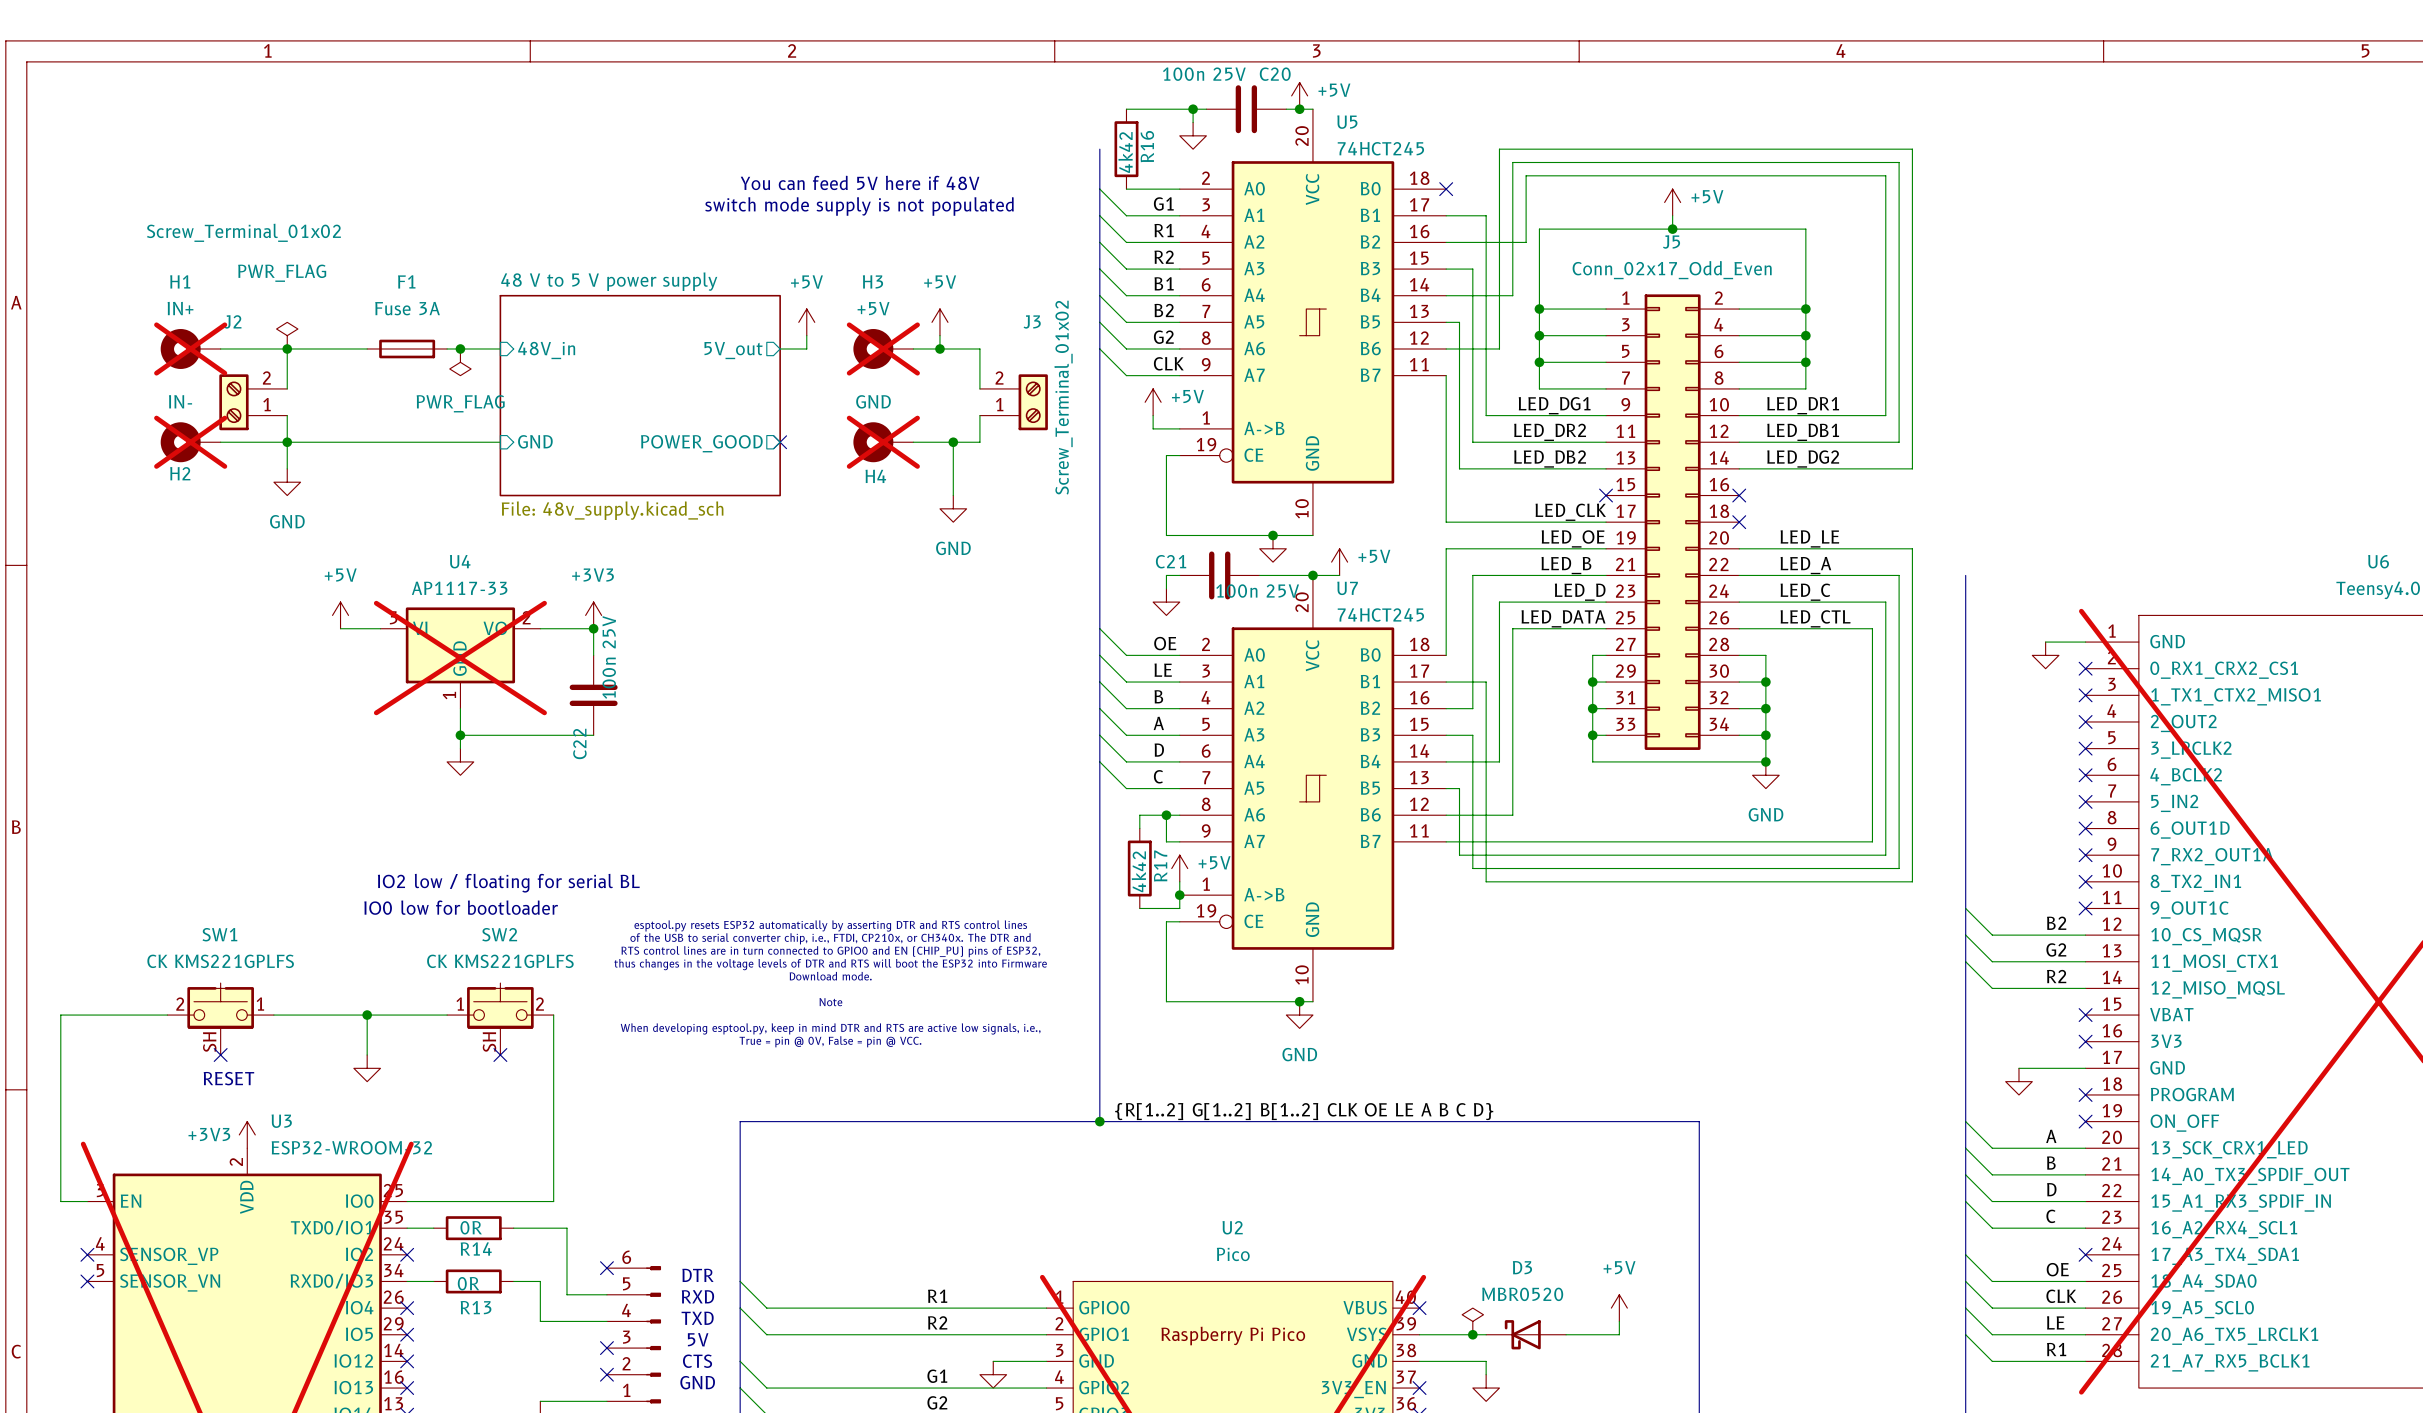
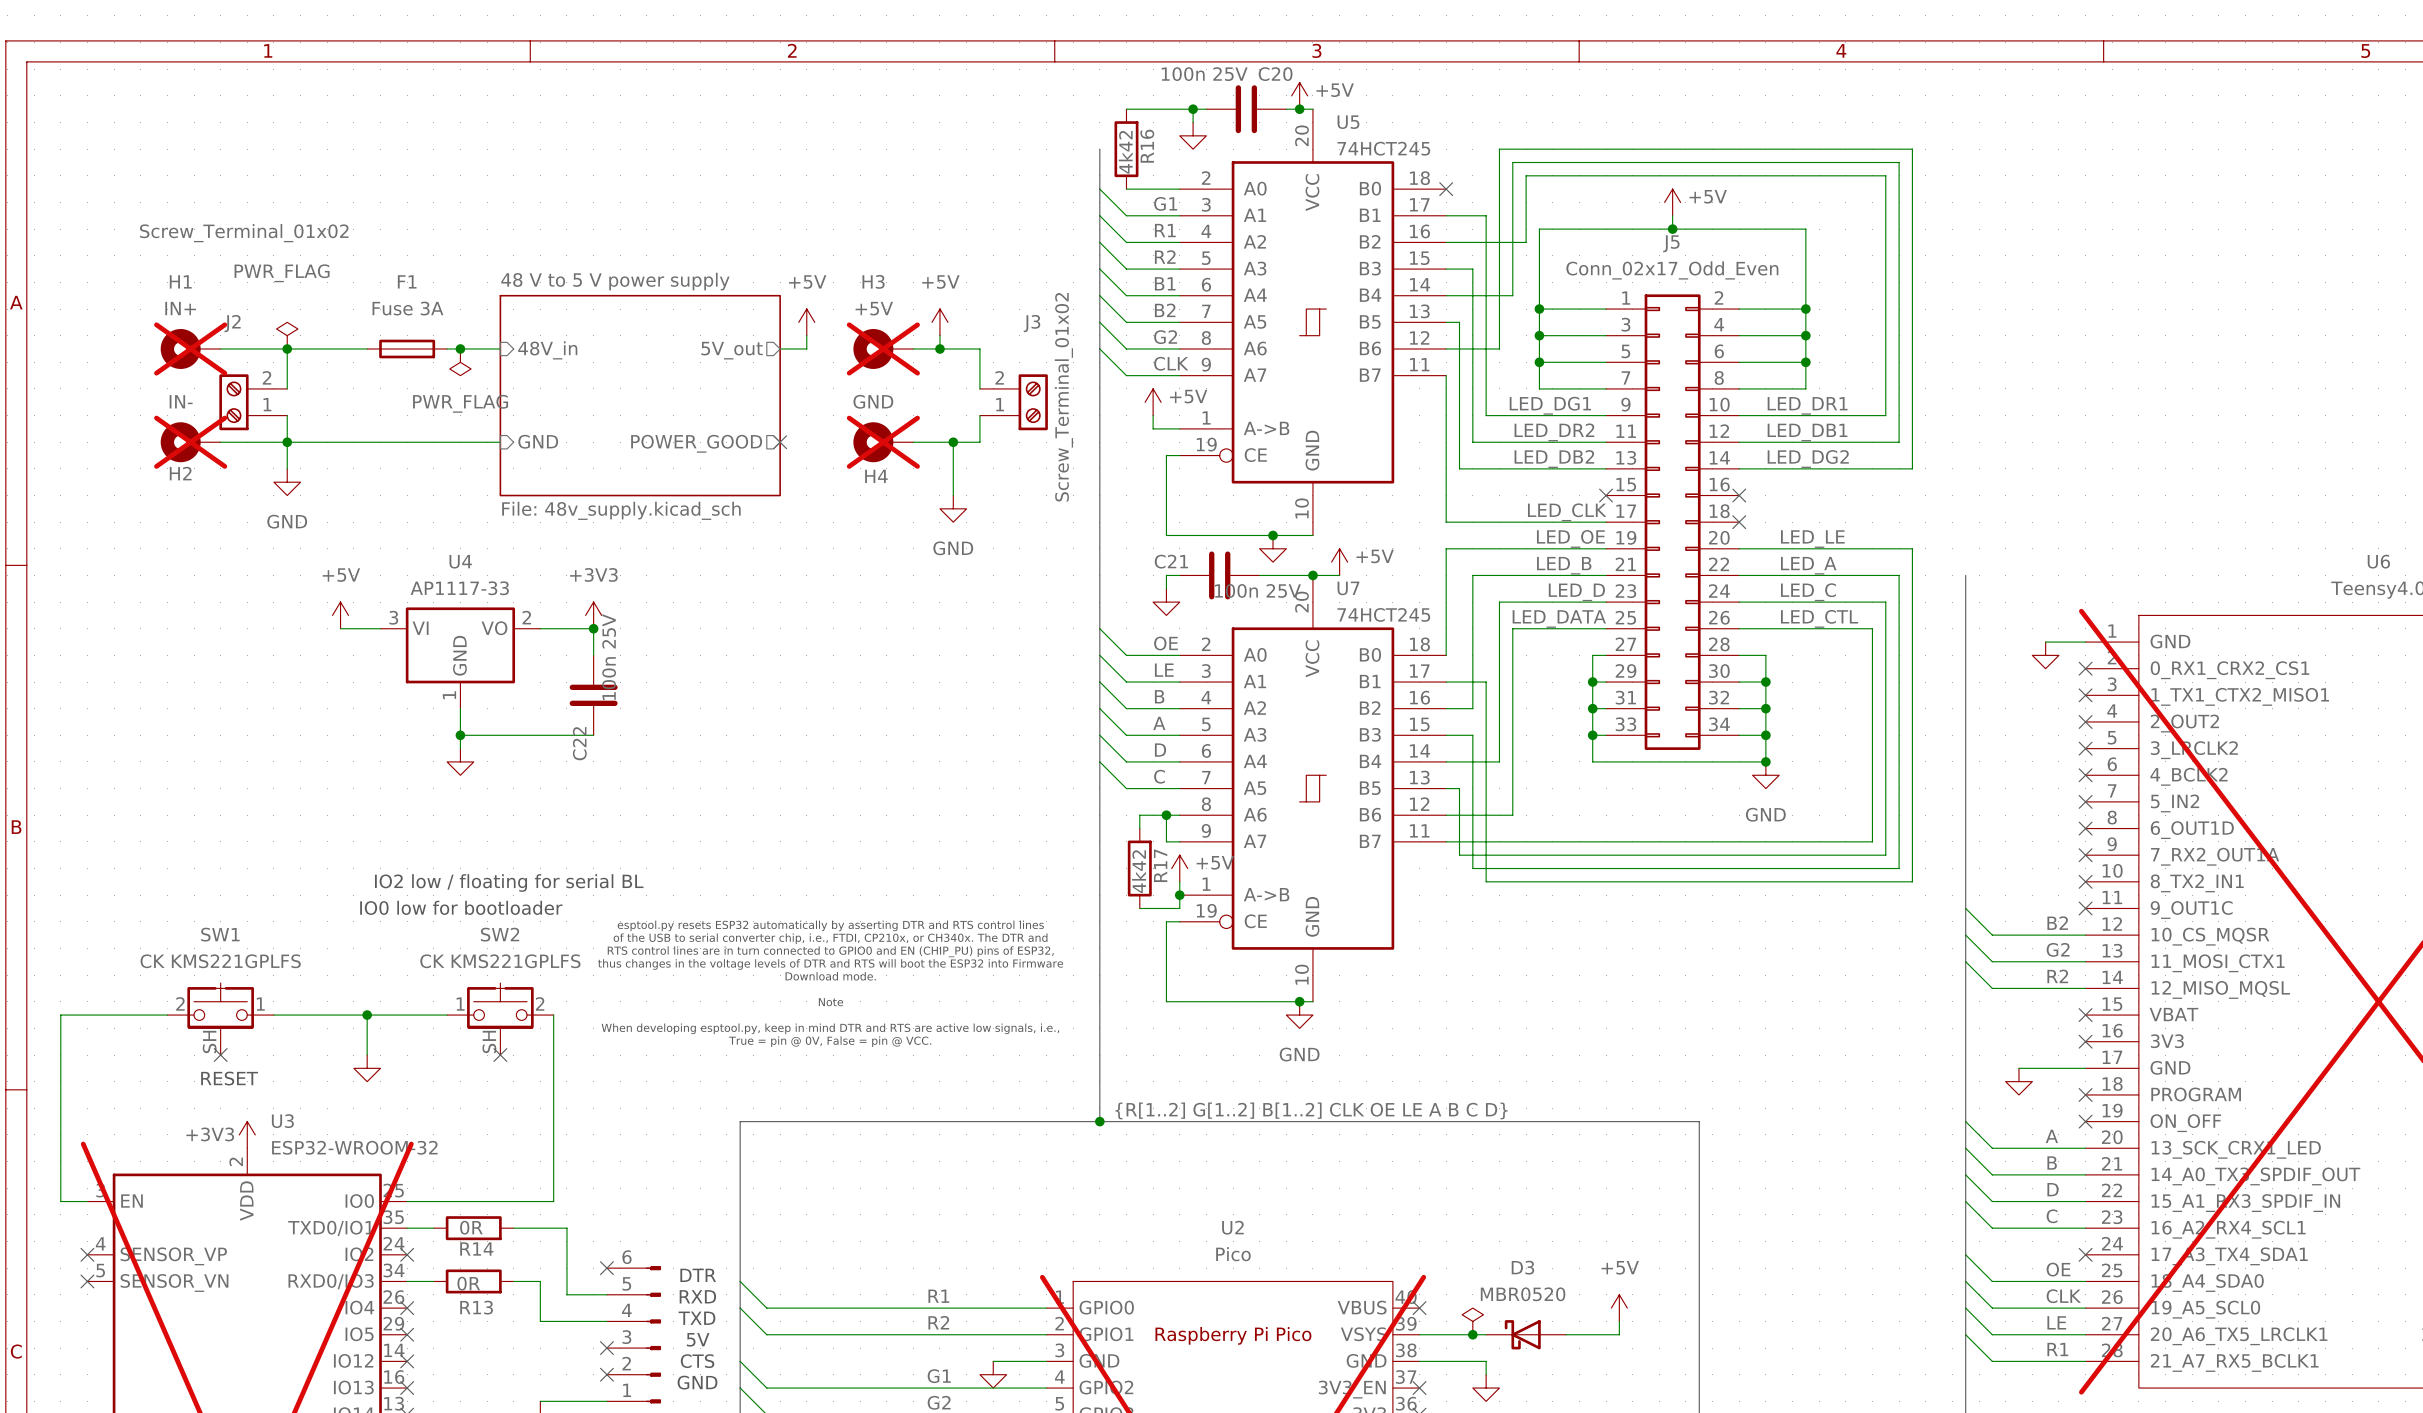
text: You can feed 5V here if 48V (860, 182) -> none
text: switch mode supply is not populated (859, 206) -> none
U4 do-not-place cross: (460, 658) -> none

